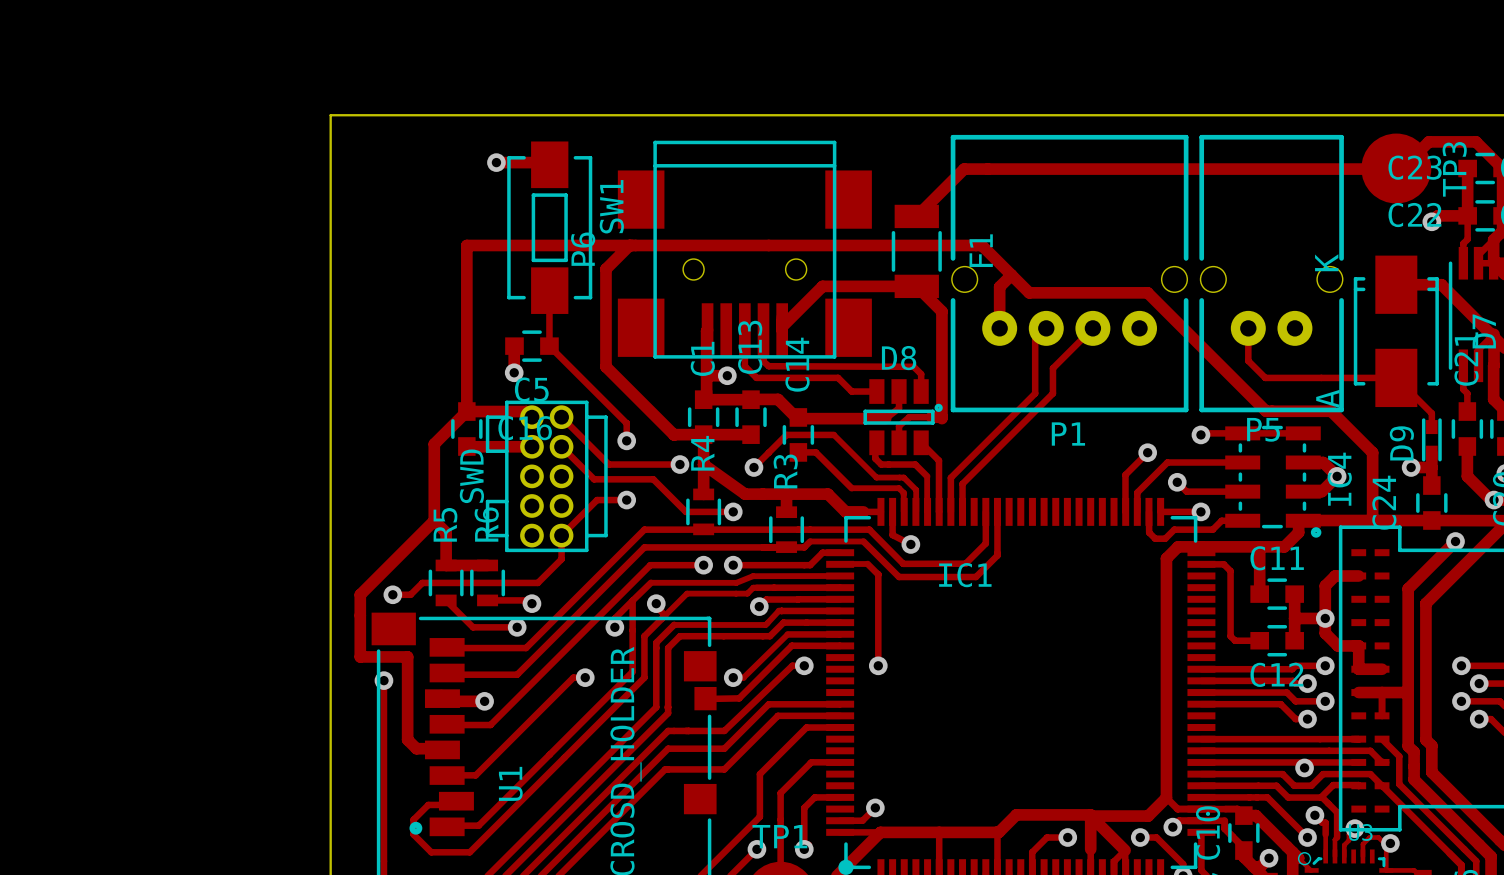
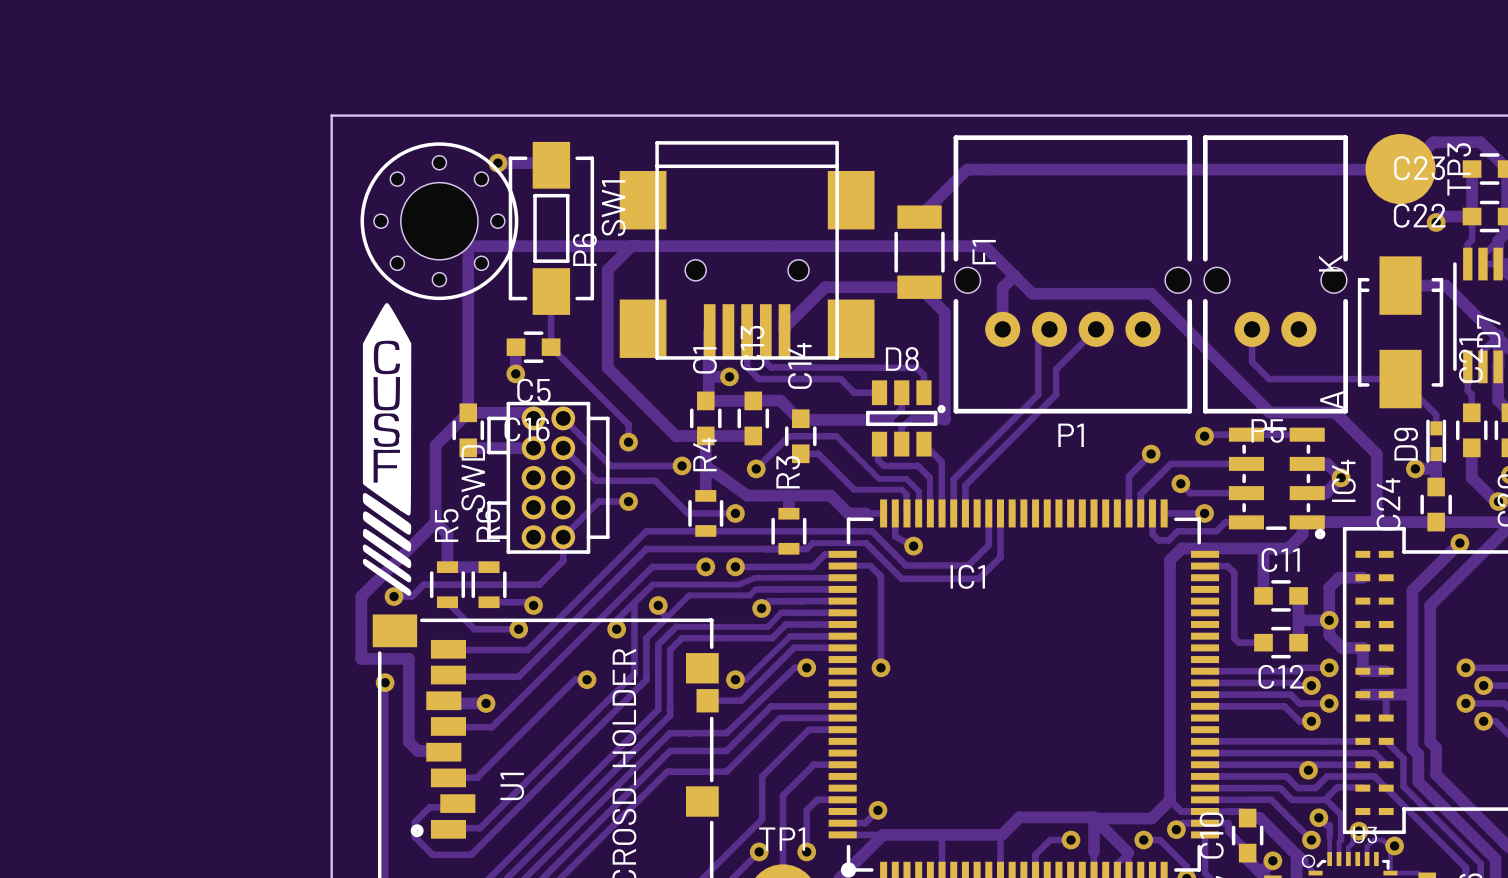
part: none -> (439, 221)
drawing: none -> [362, 303, 412, 596]

